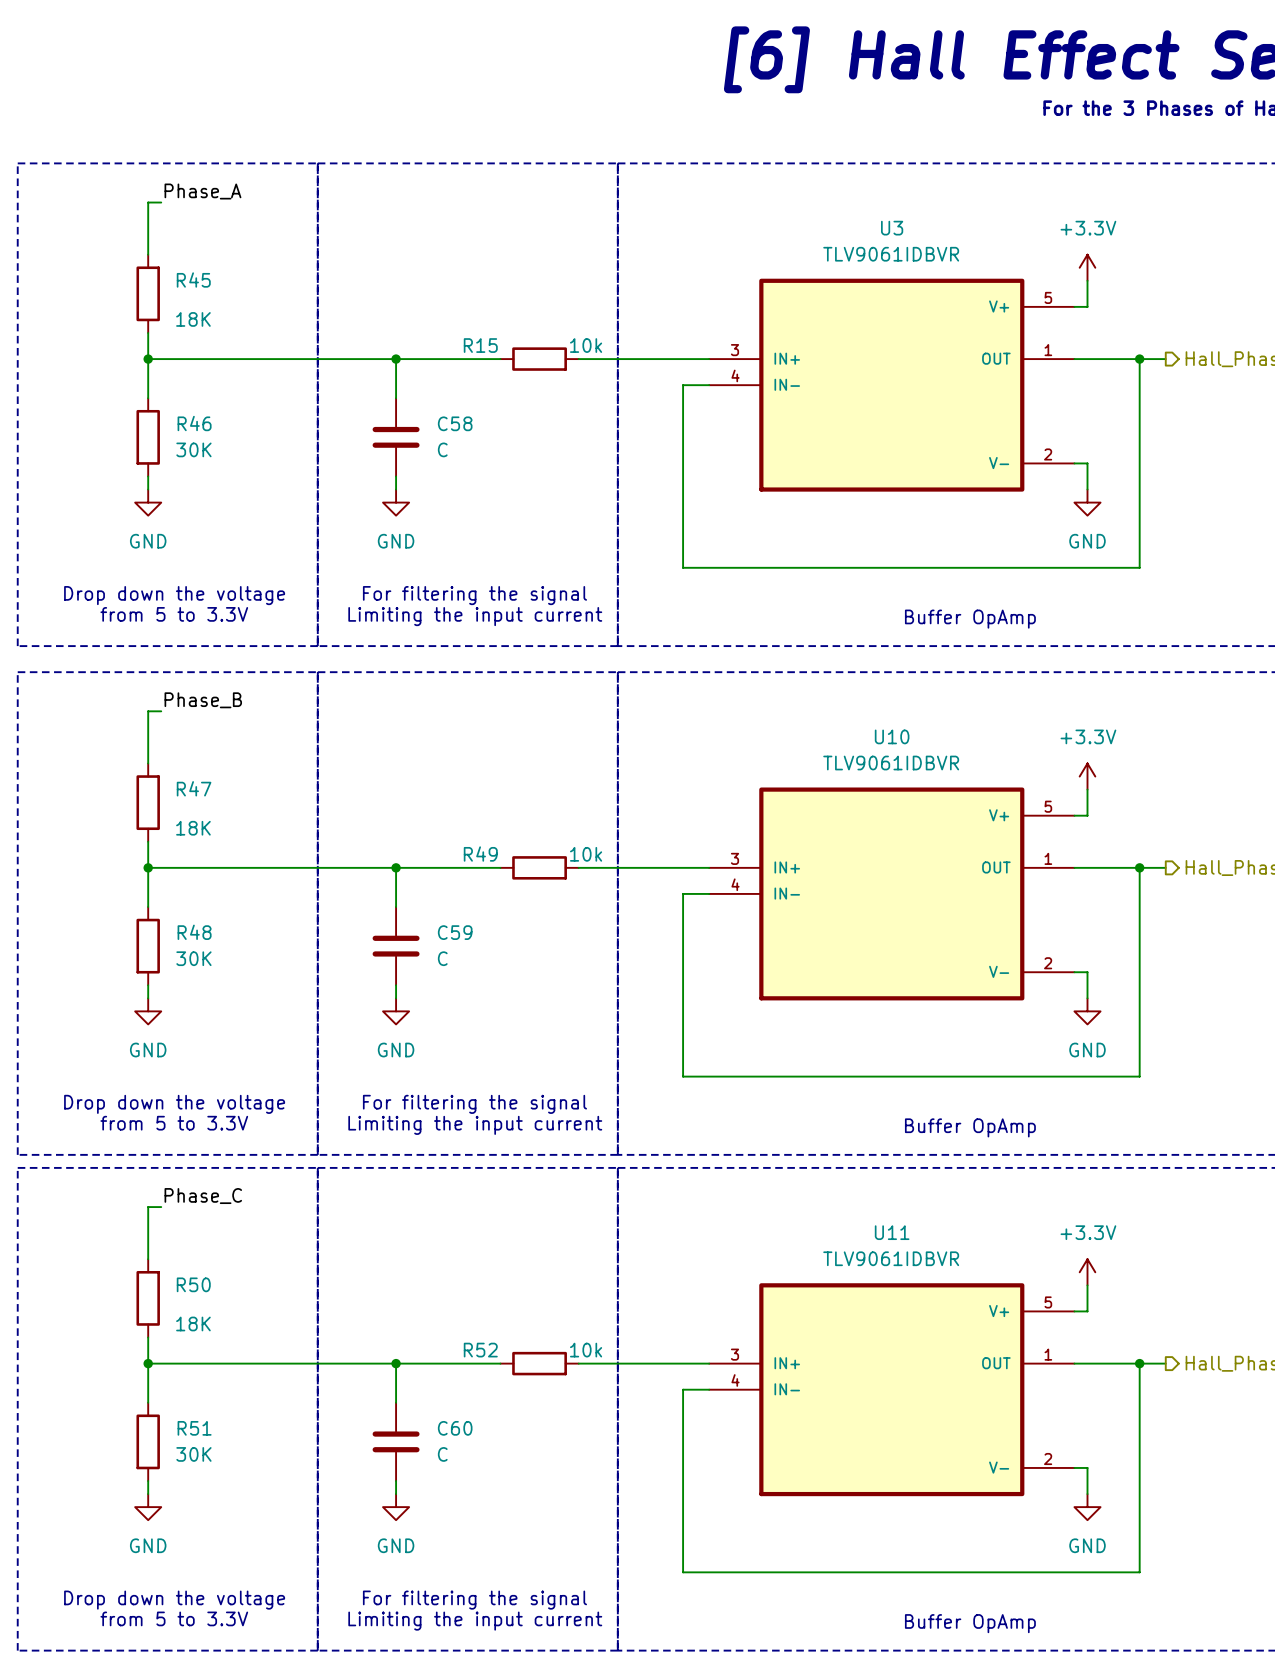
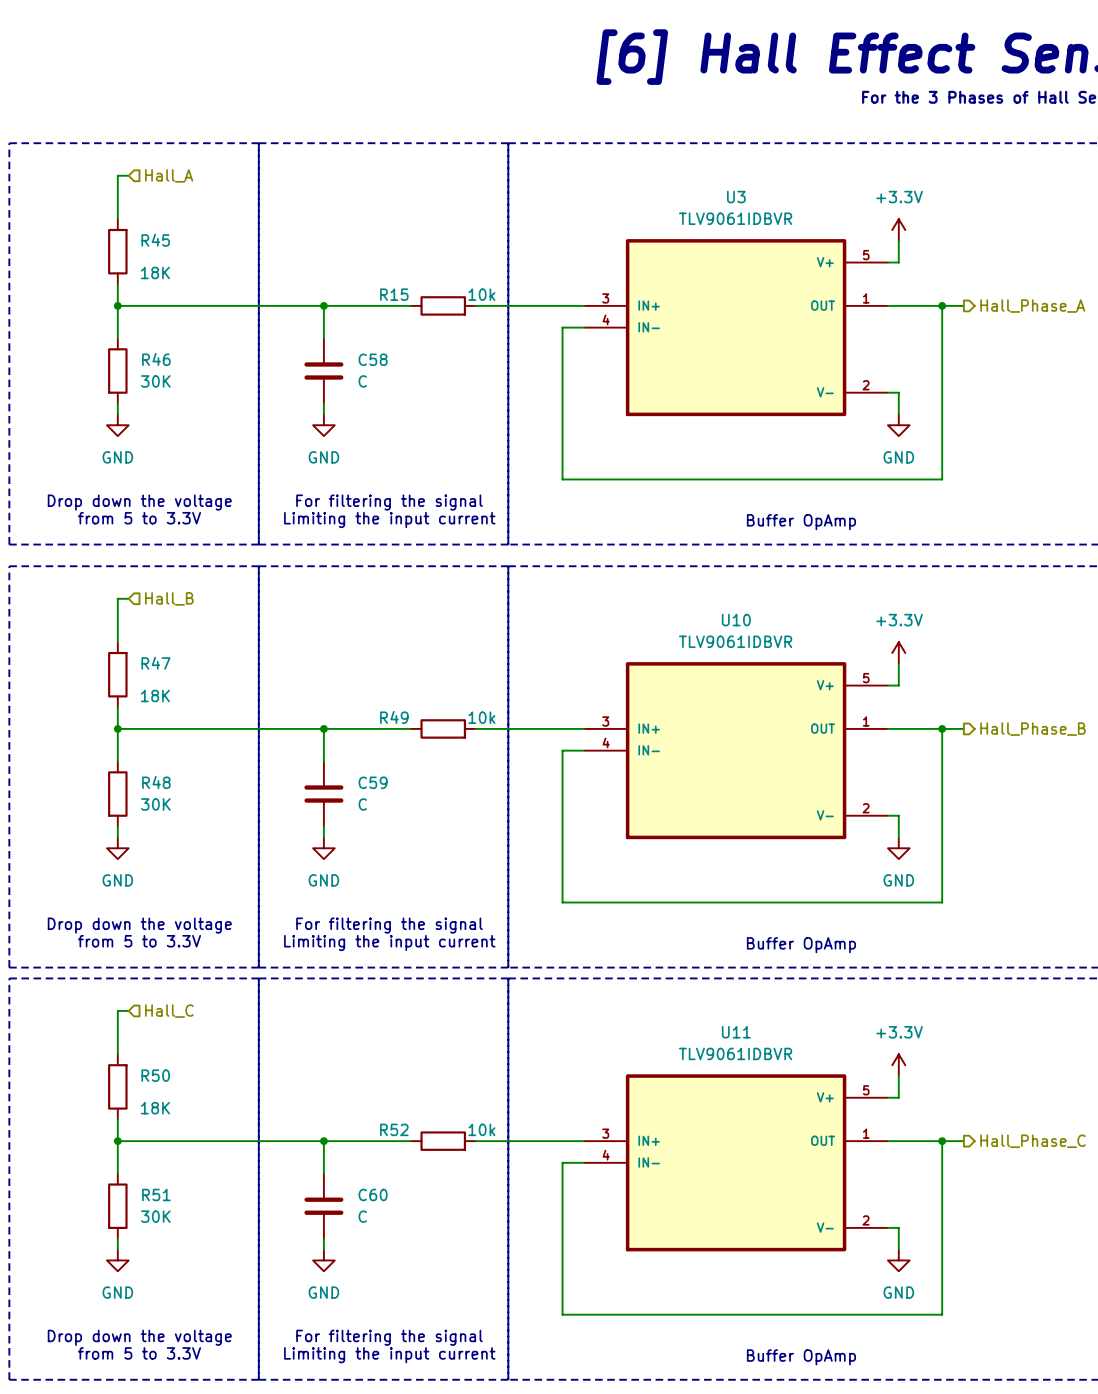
label: Phase_A (202, 191) -> none
hierarchical label: none -> Hall_A (169, 175)
label: Phase_B (203, 700) -> none
hierarchical label: none -> Hall_B (169, 598)
label: Phase_C (203, 1196) -> none
hierarchical label: none -> Hall_C (169, 1011)

